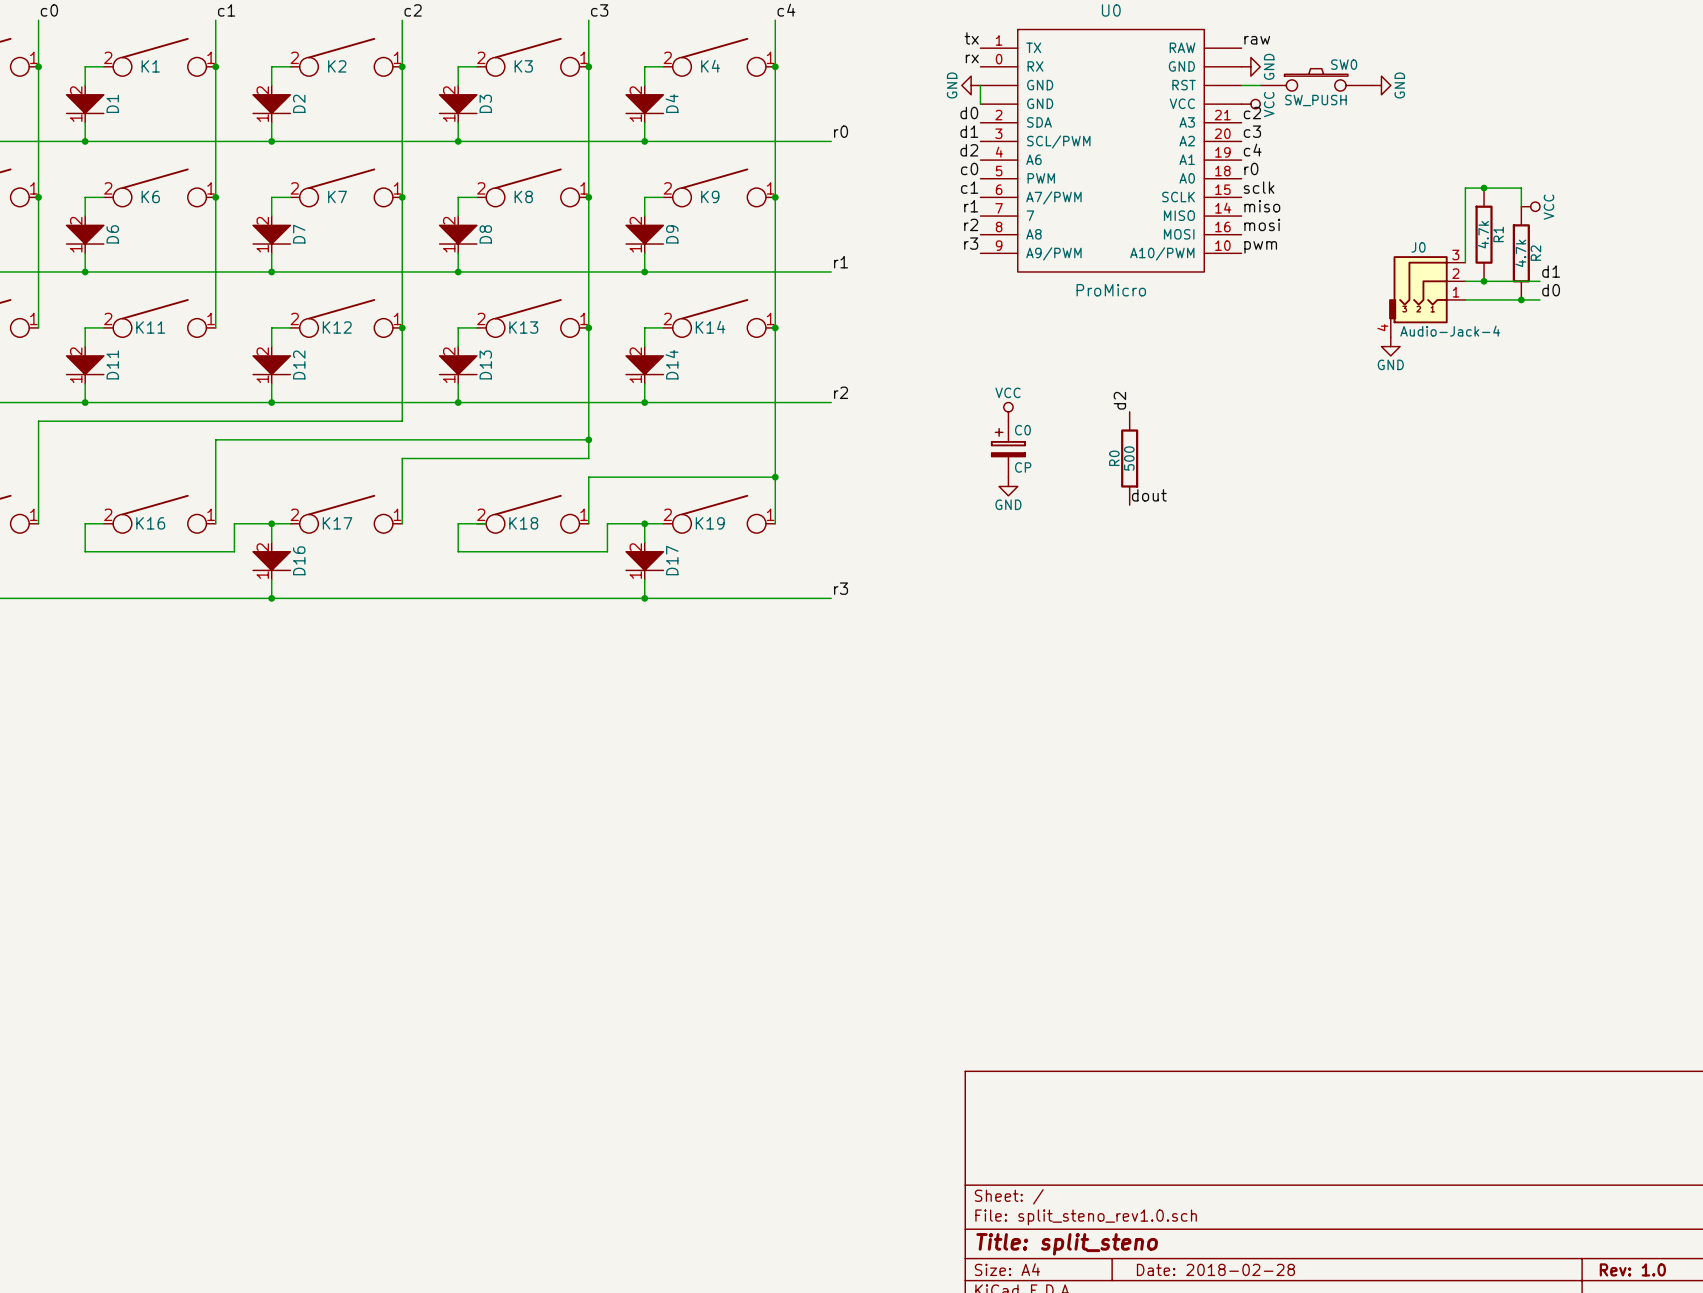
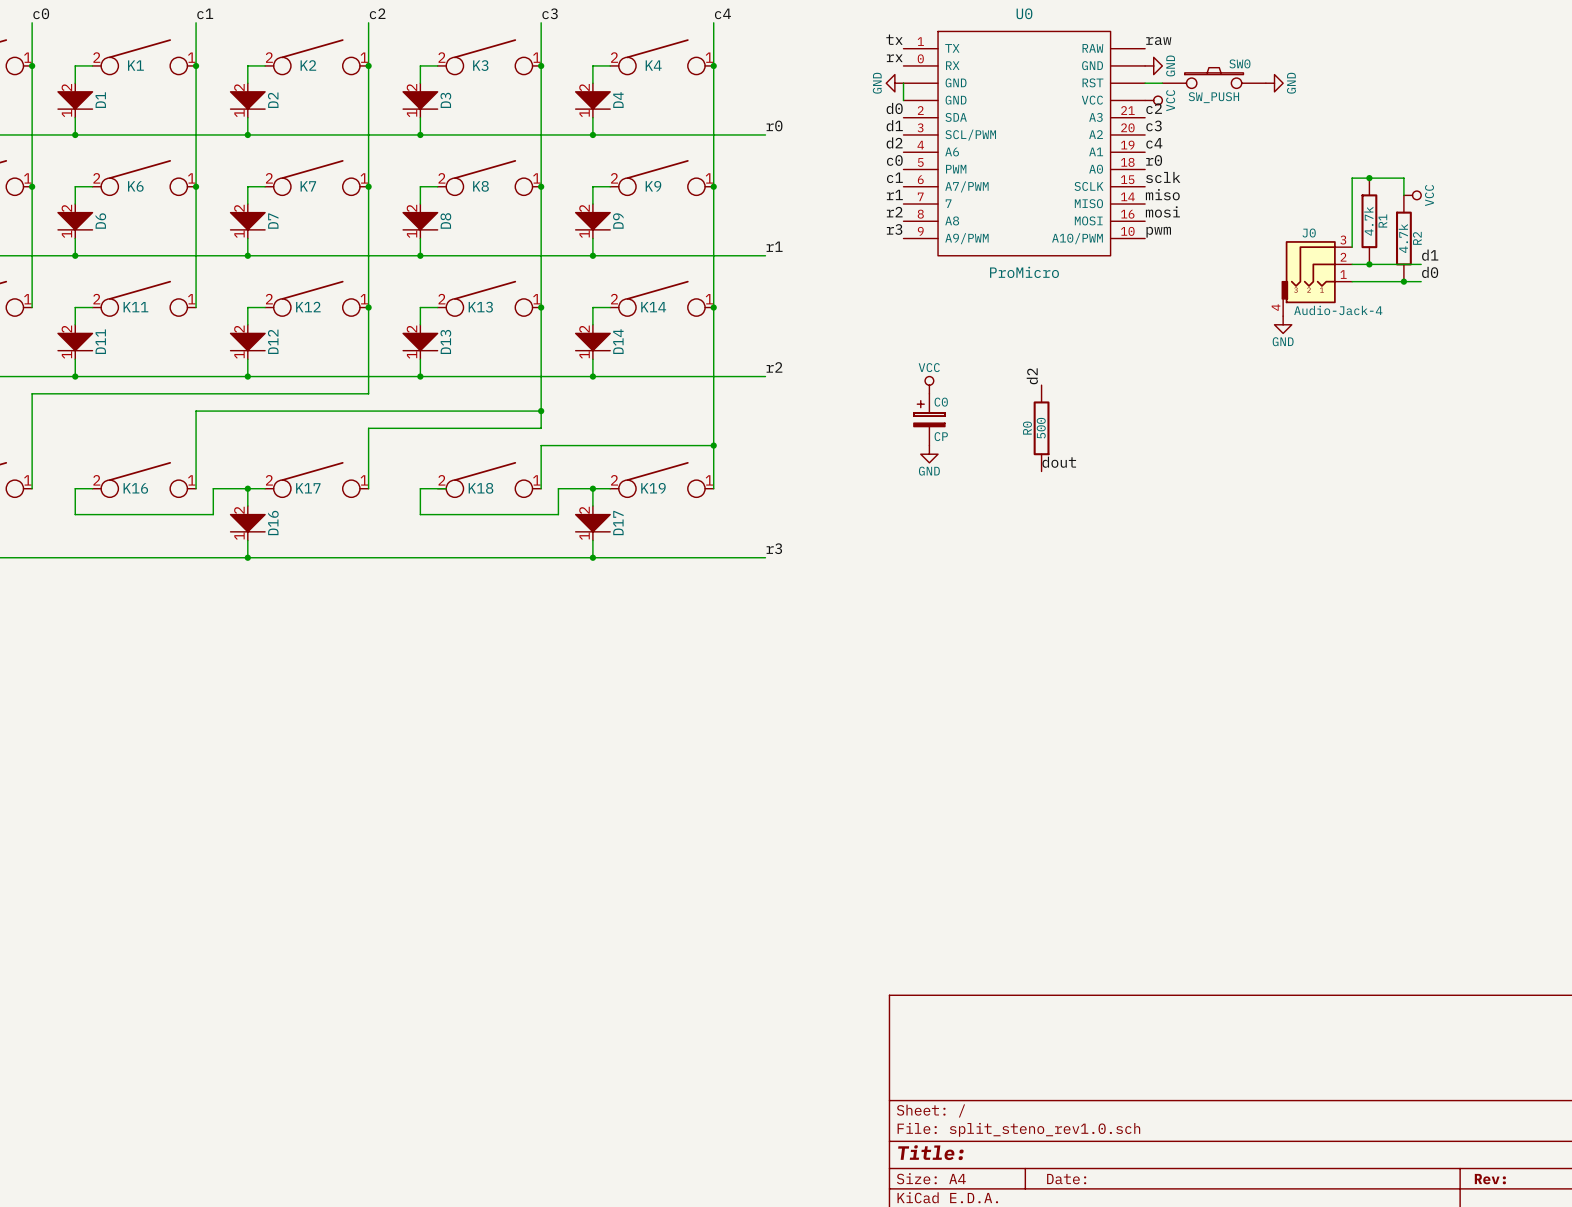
title block: Title: split_steno (1067, 1244) -> Title: (930, 1152)
title block: Date: 2018-02-28 (1215, 1269) -> Date: (1066, 1179)
title block: Rev: 1.0 (1632, 1269) -> Rev: (1490, 1179)

